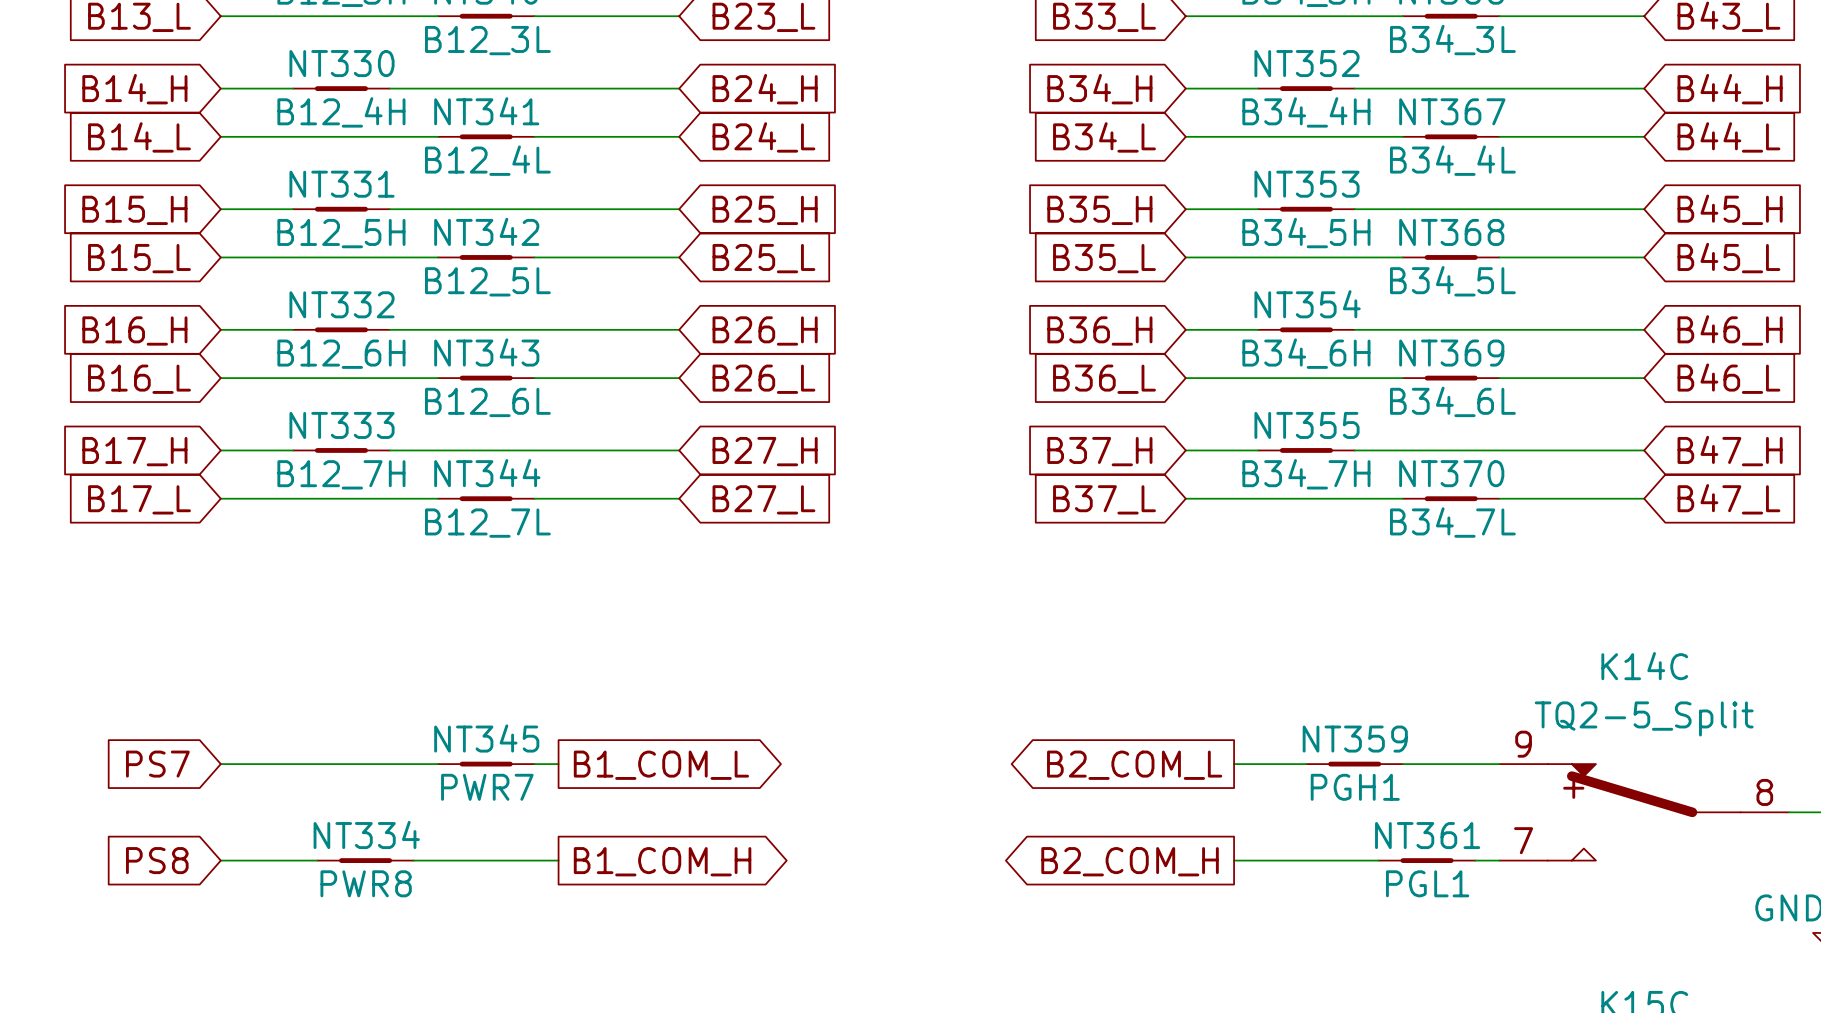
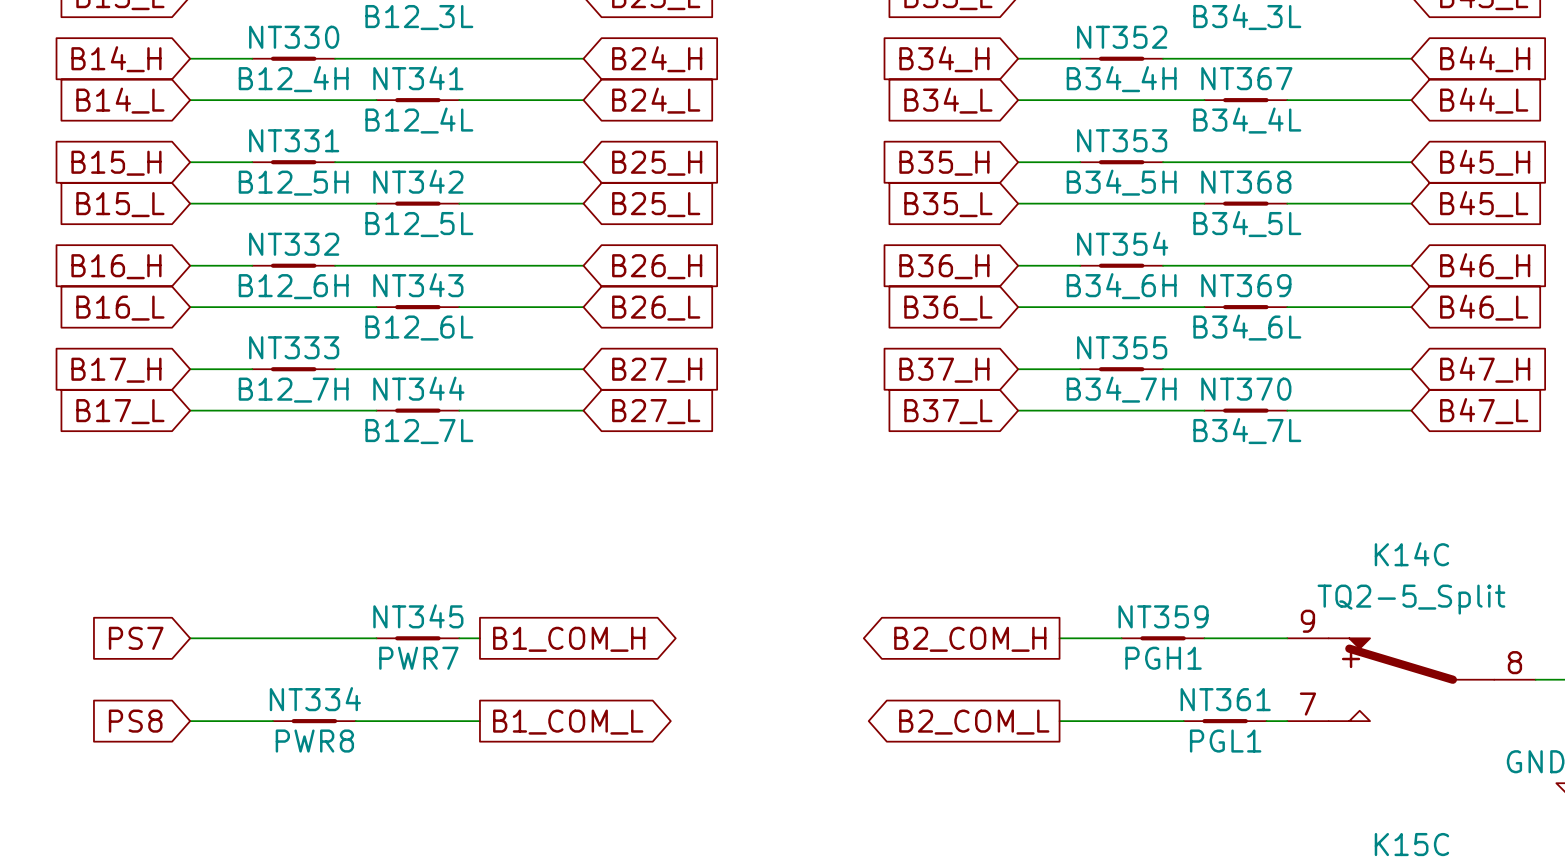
global label: B1_COM_L (661, 765) -> B1_COM_H (569, 639)
global label: B2_COM_L (1134, 765) -> B2_COM_H (970, 639)
global label: B1_COM_H (662, 861) -> B1_COM_L (568, 722)
global label: B2_COM_H (1130, 861) -> B2_COM_L (974, 722)

